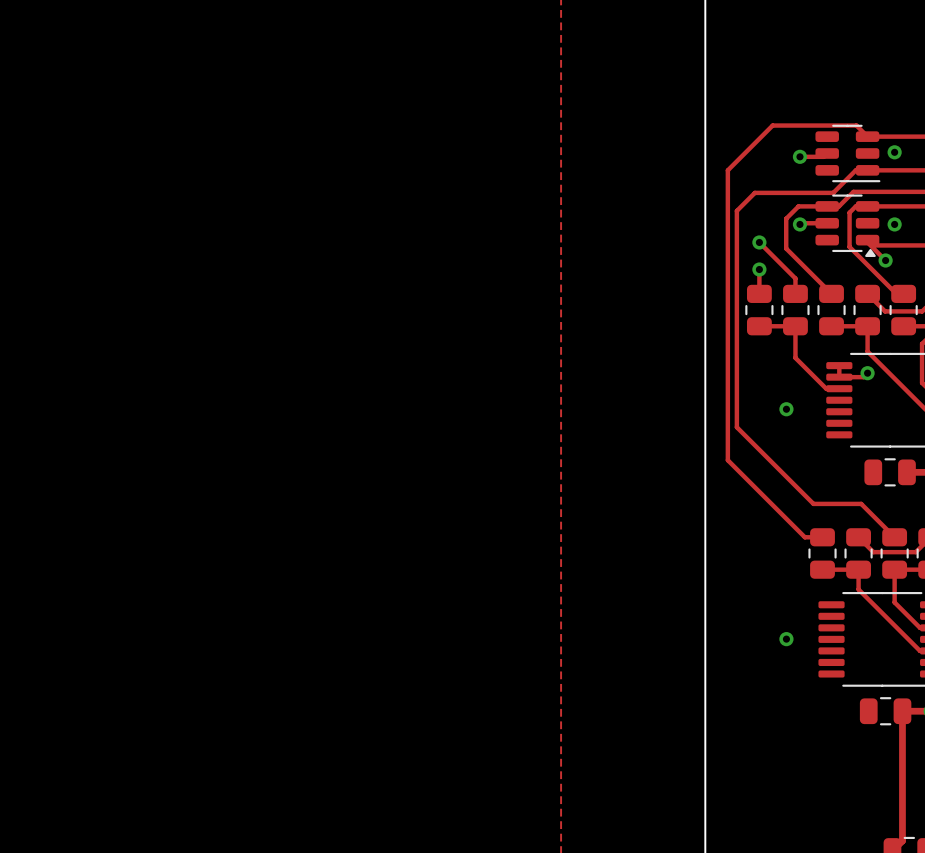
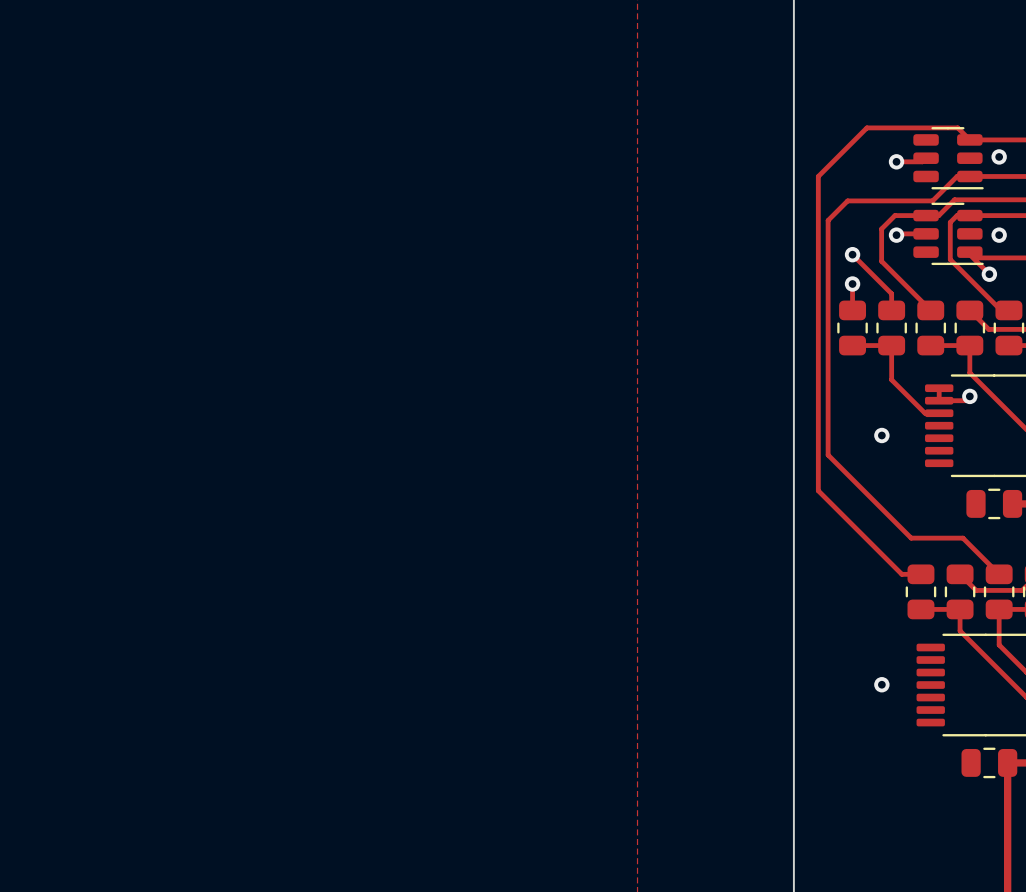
part footprint: [815, 194, 880, 257] -> [913, 202, 984, 266]

